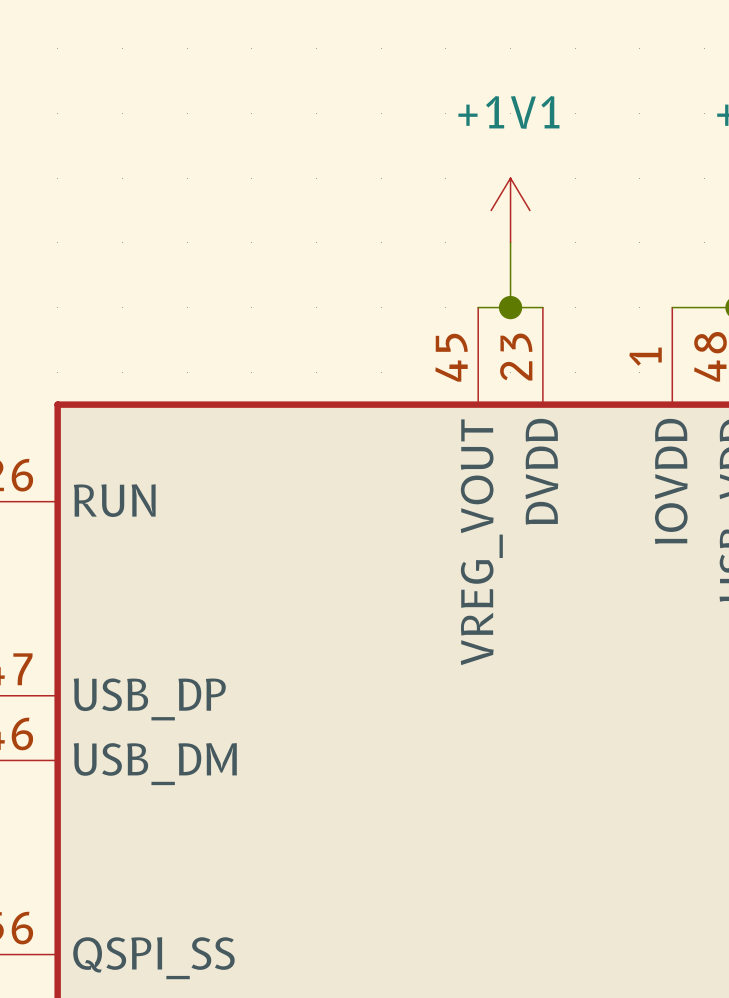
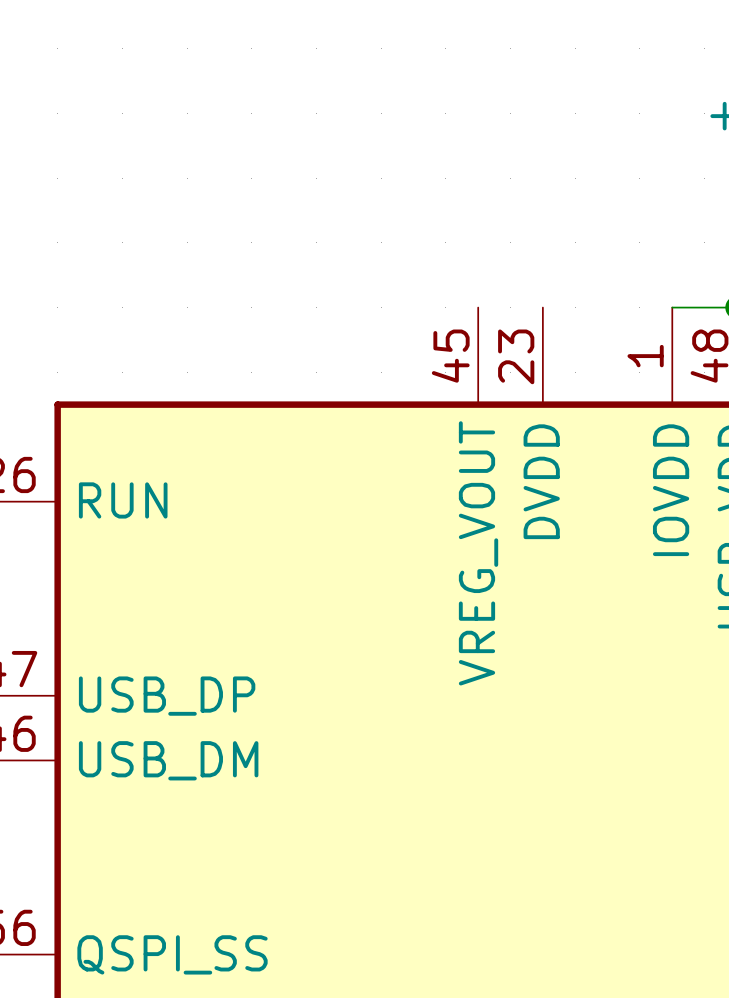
power symbol: +1V1 (510, 210) -> none
wire: (510, 242) (510, 307) -> none
wire: (478, 307) (542, 307) -> none
junction: (510, 307) -> none

